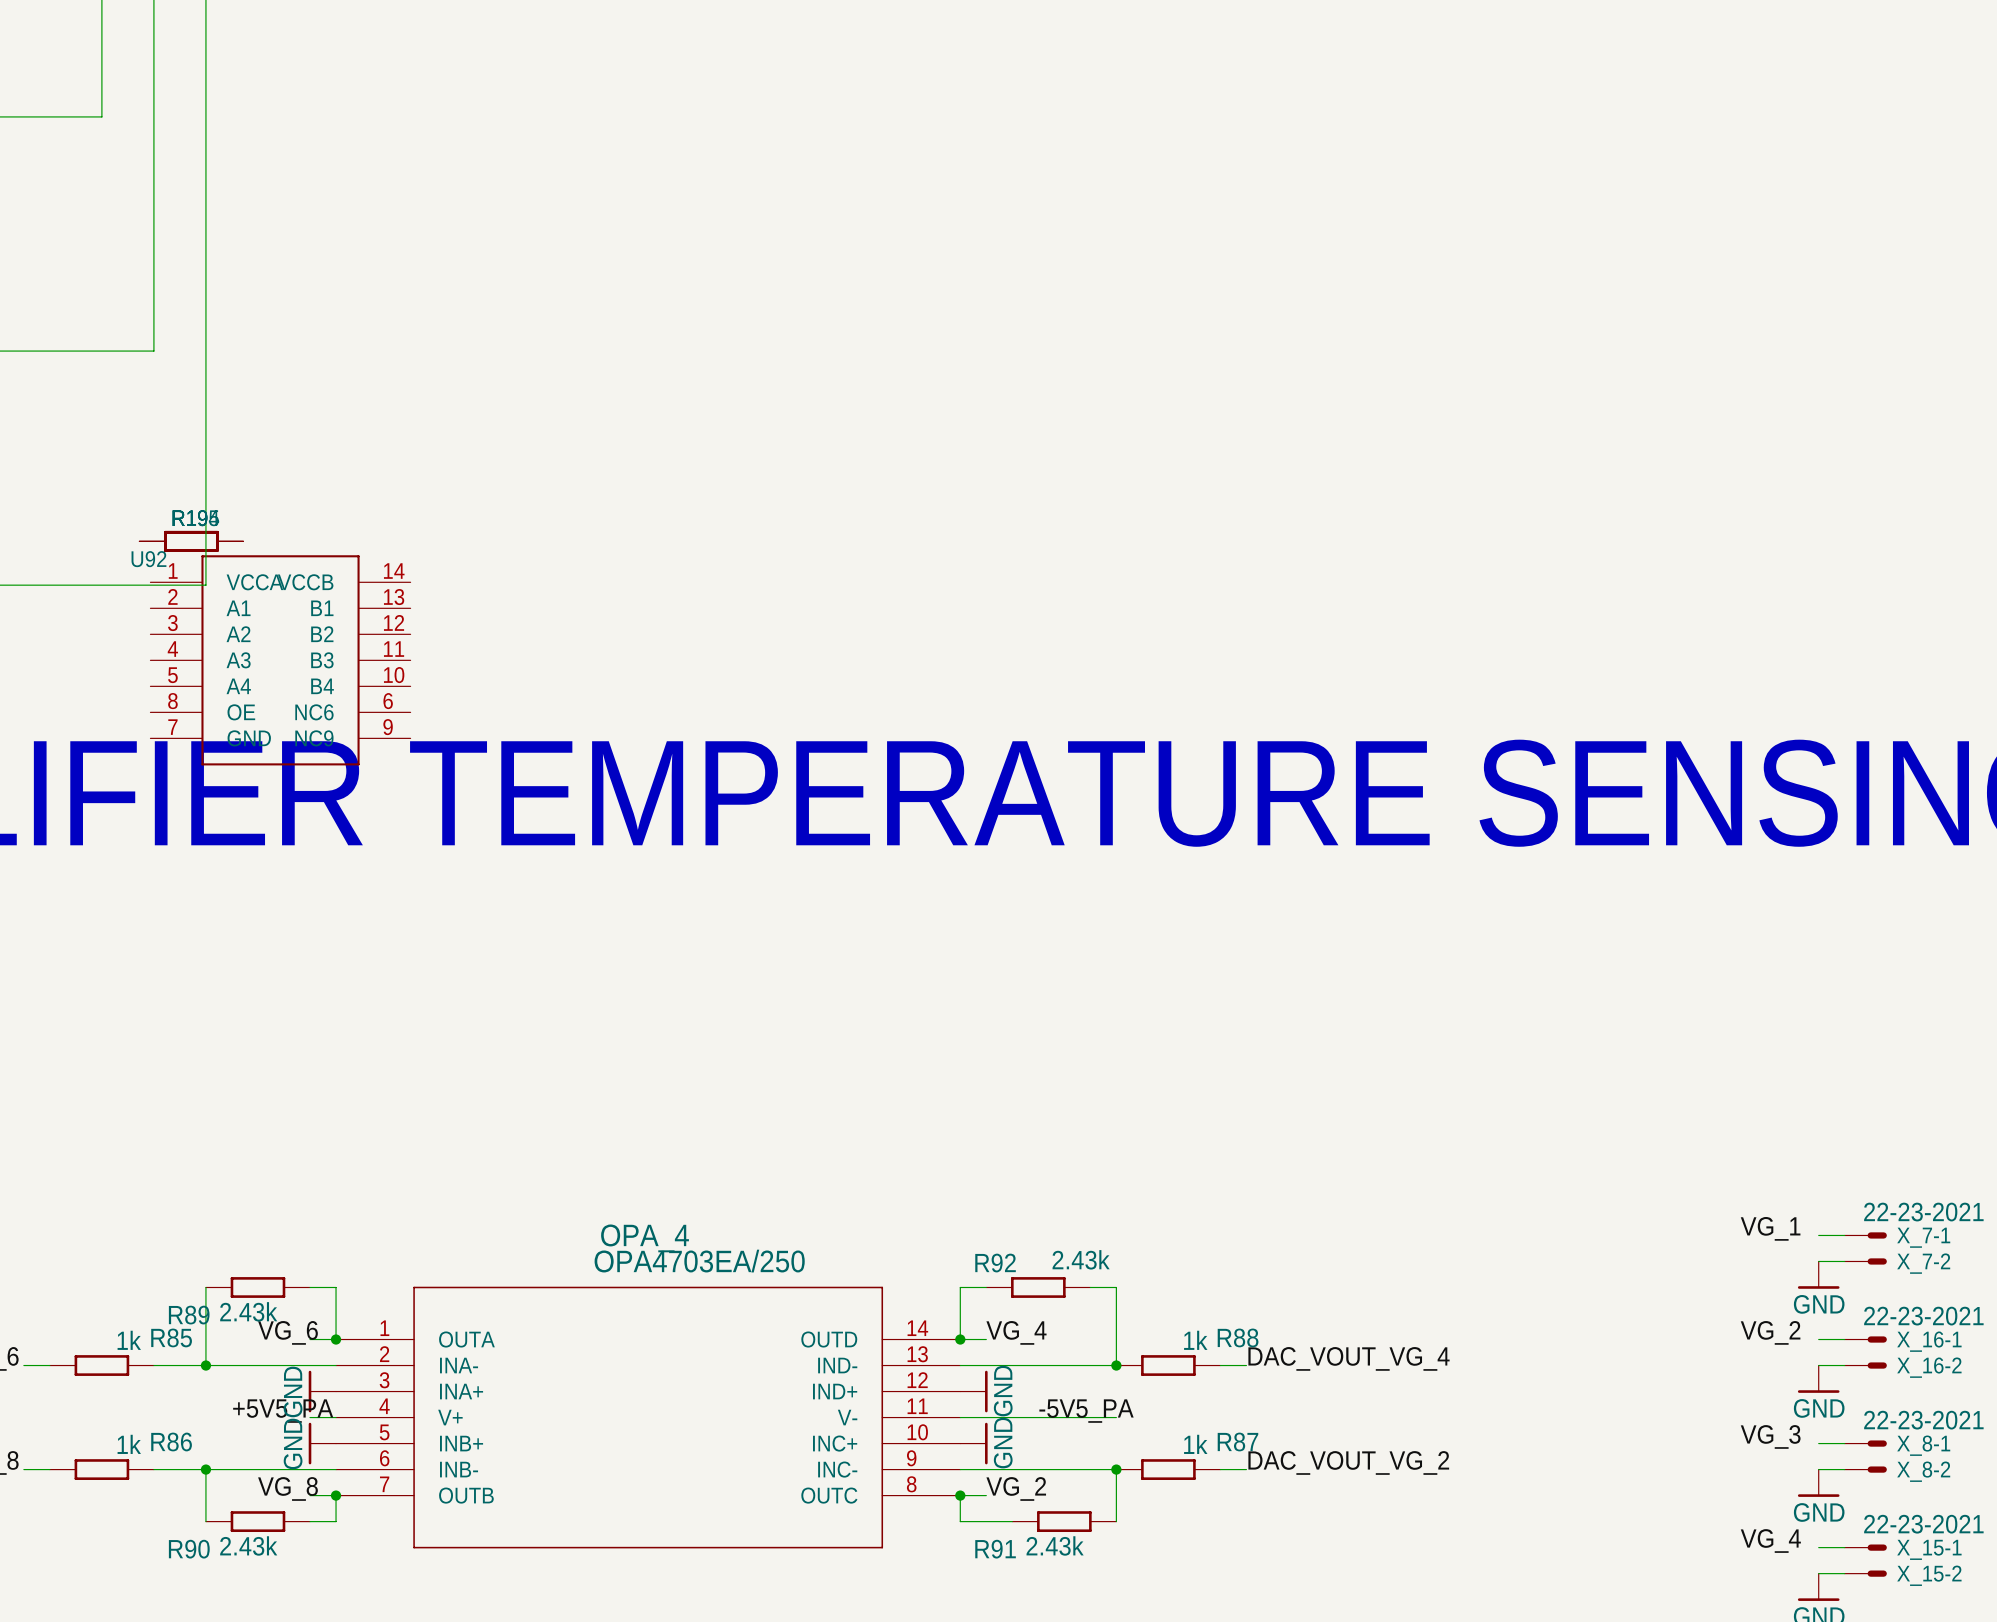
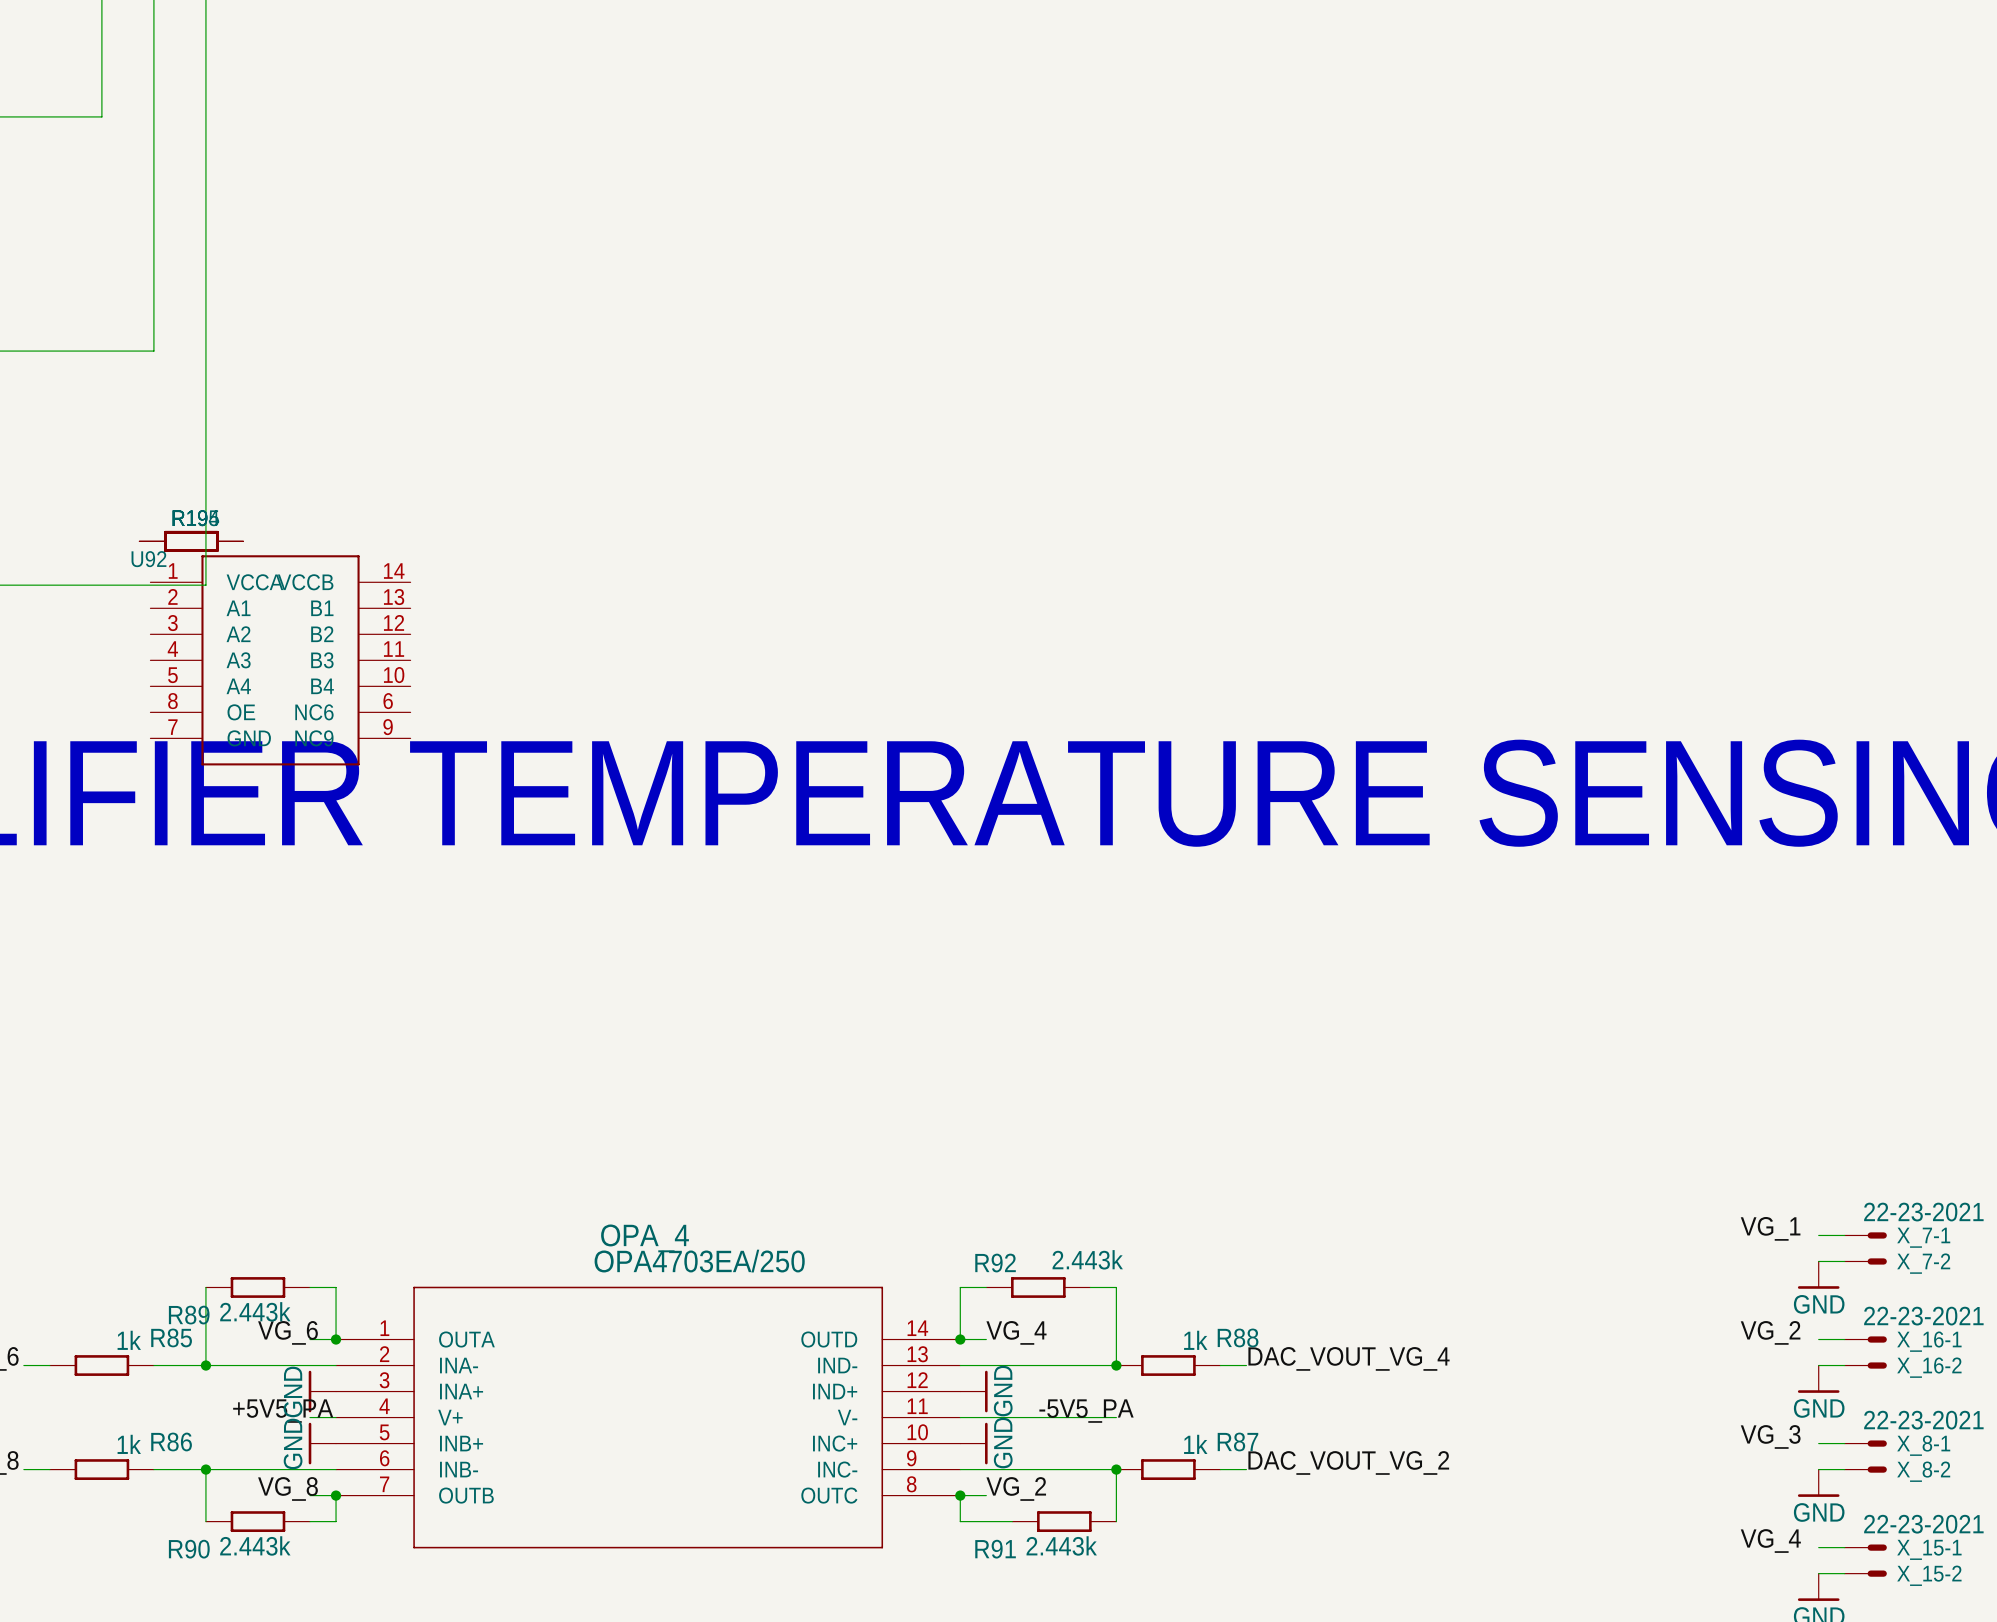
R92 value: 2.43k (1081, 1259) -> 2.443k (1087, 1259)
R89 value: 2.43k (248, 1311) -> 2.443k (255, 1311)
R90 value: 2.43k (248, 1545) -> 2.443k (255, 1545)
R91 value: 2.43k (1055, 1545) -> 2.443k (1061, 1545)

